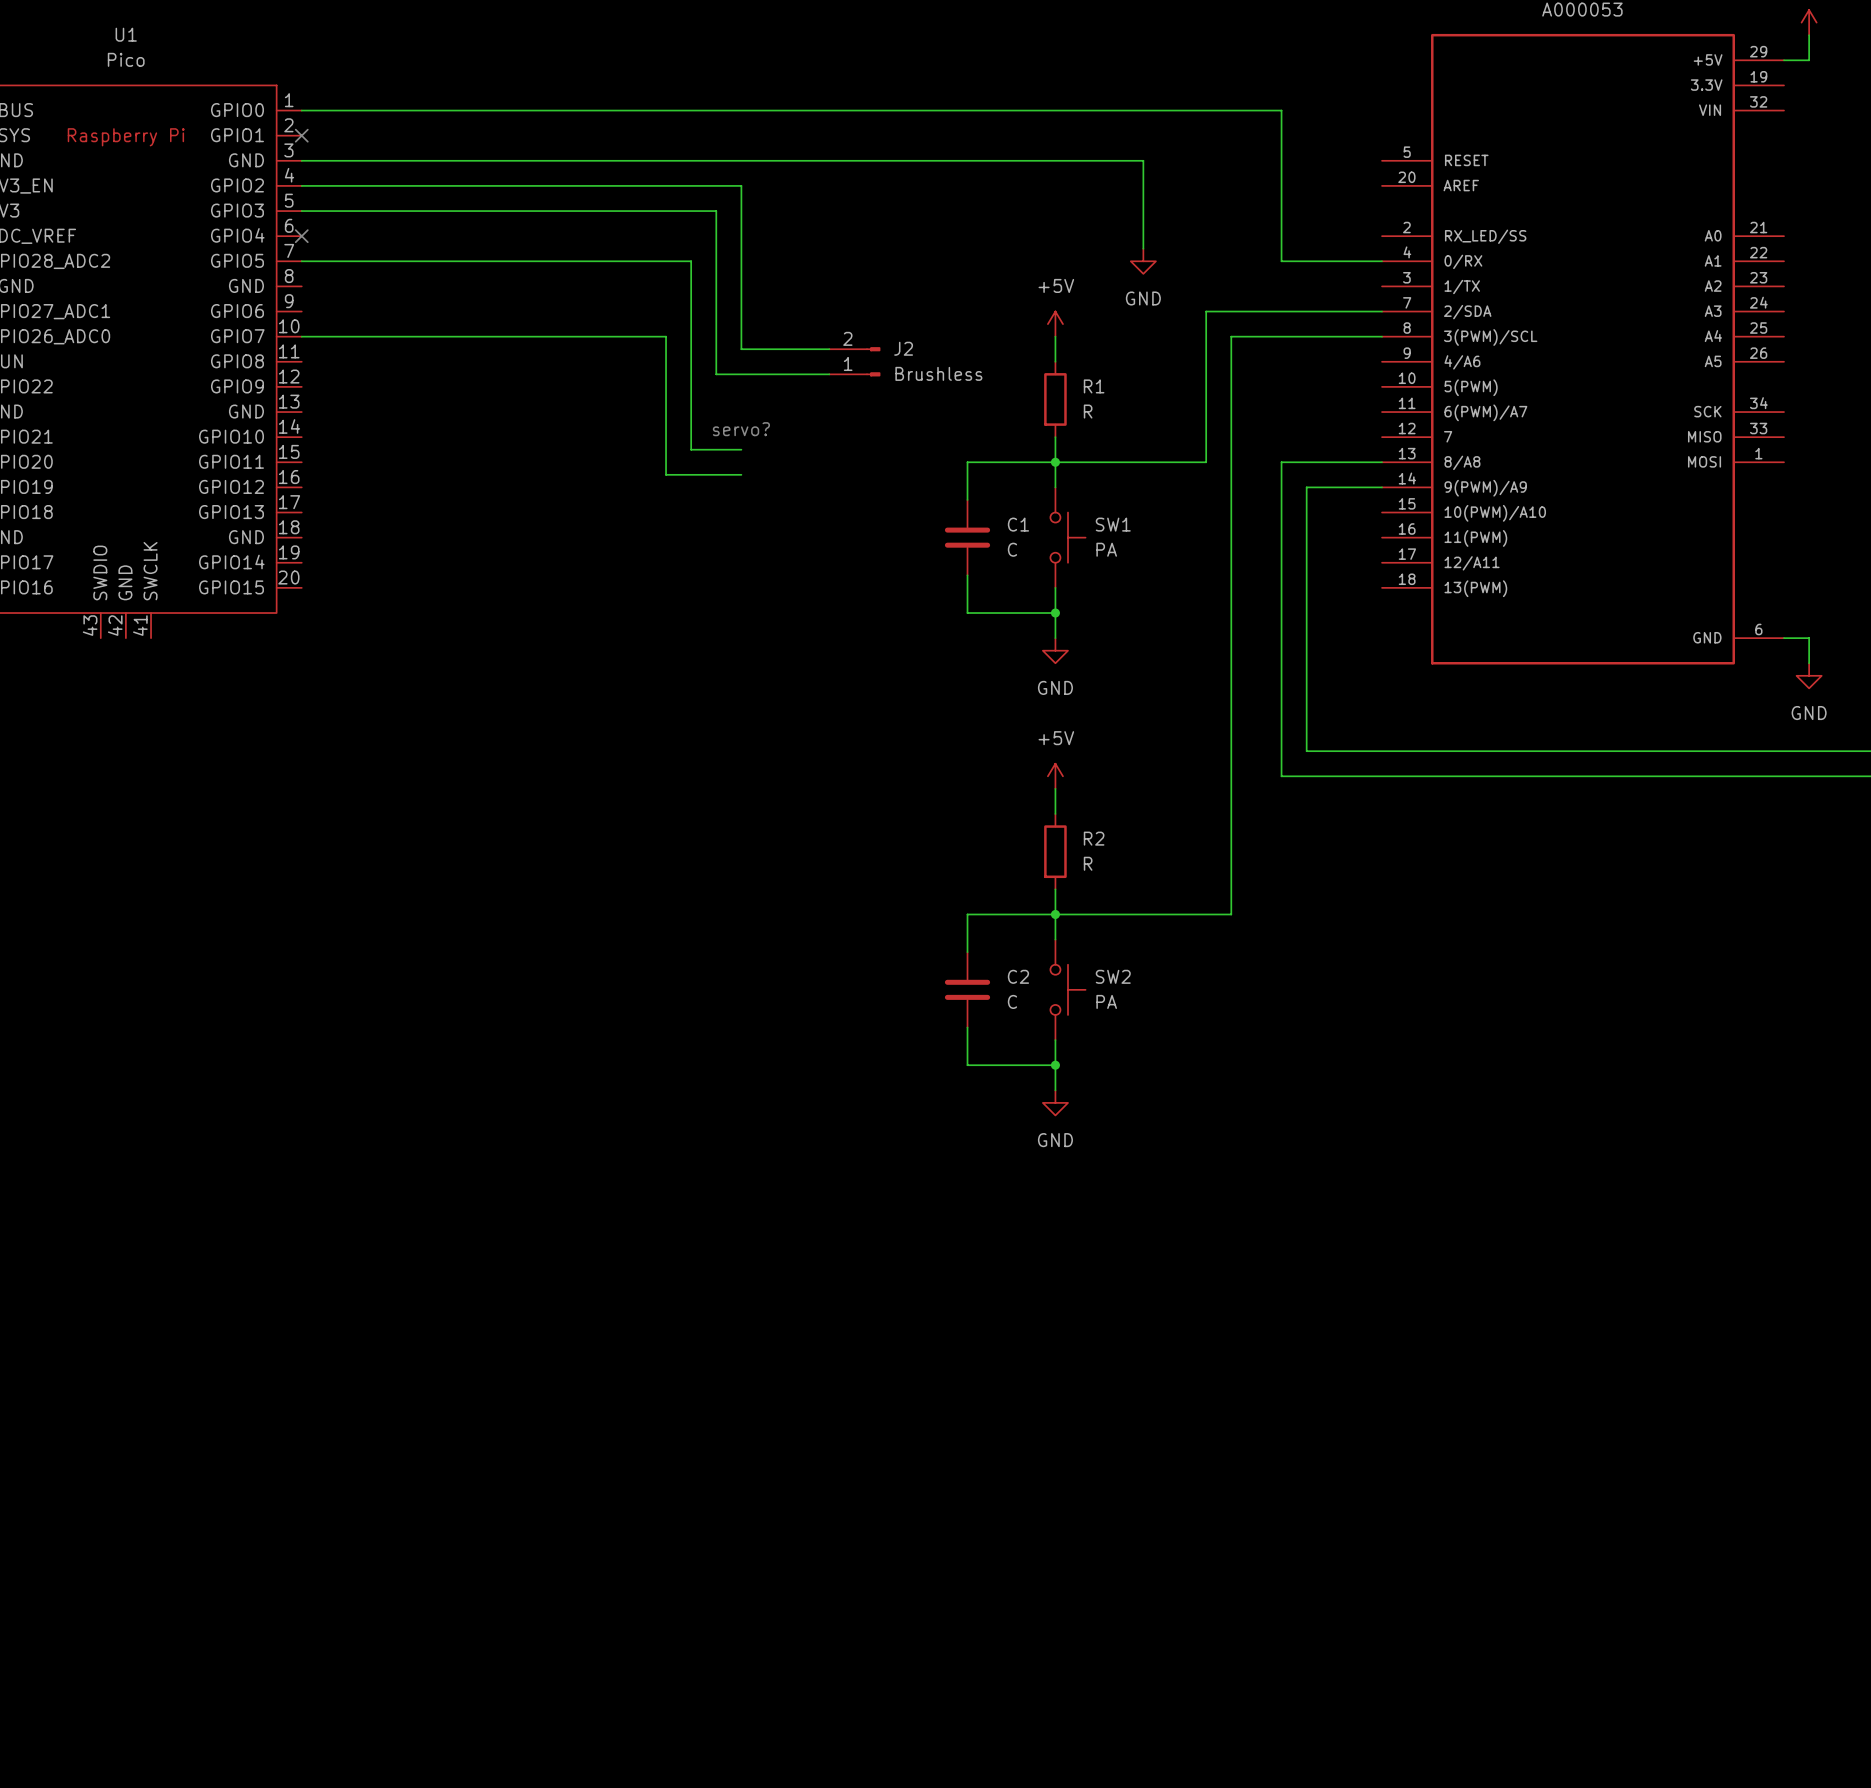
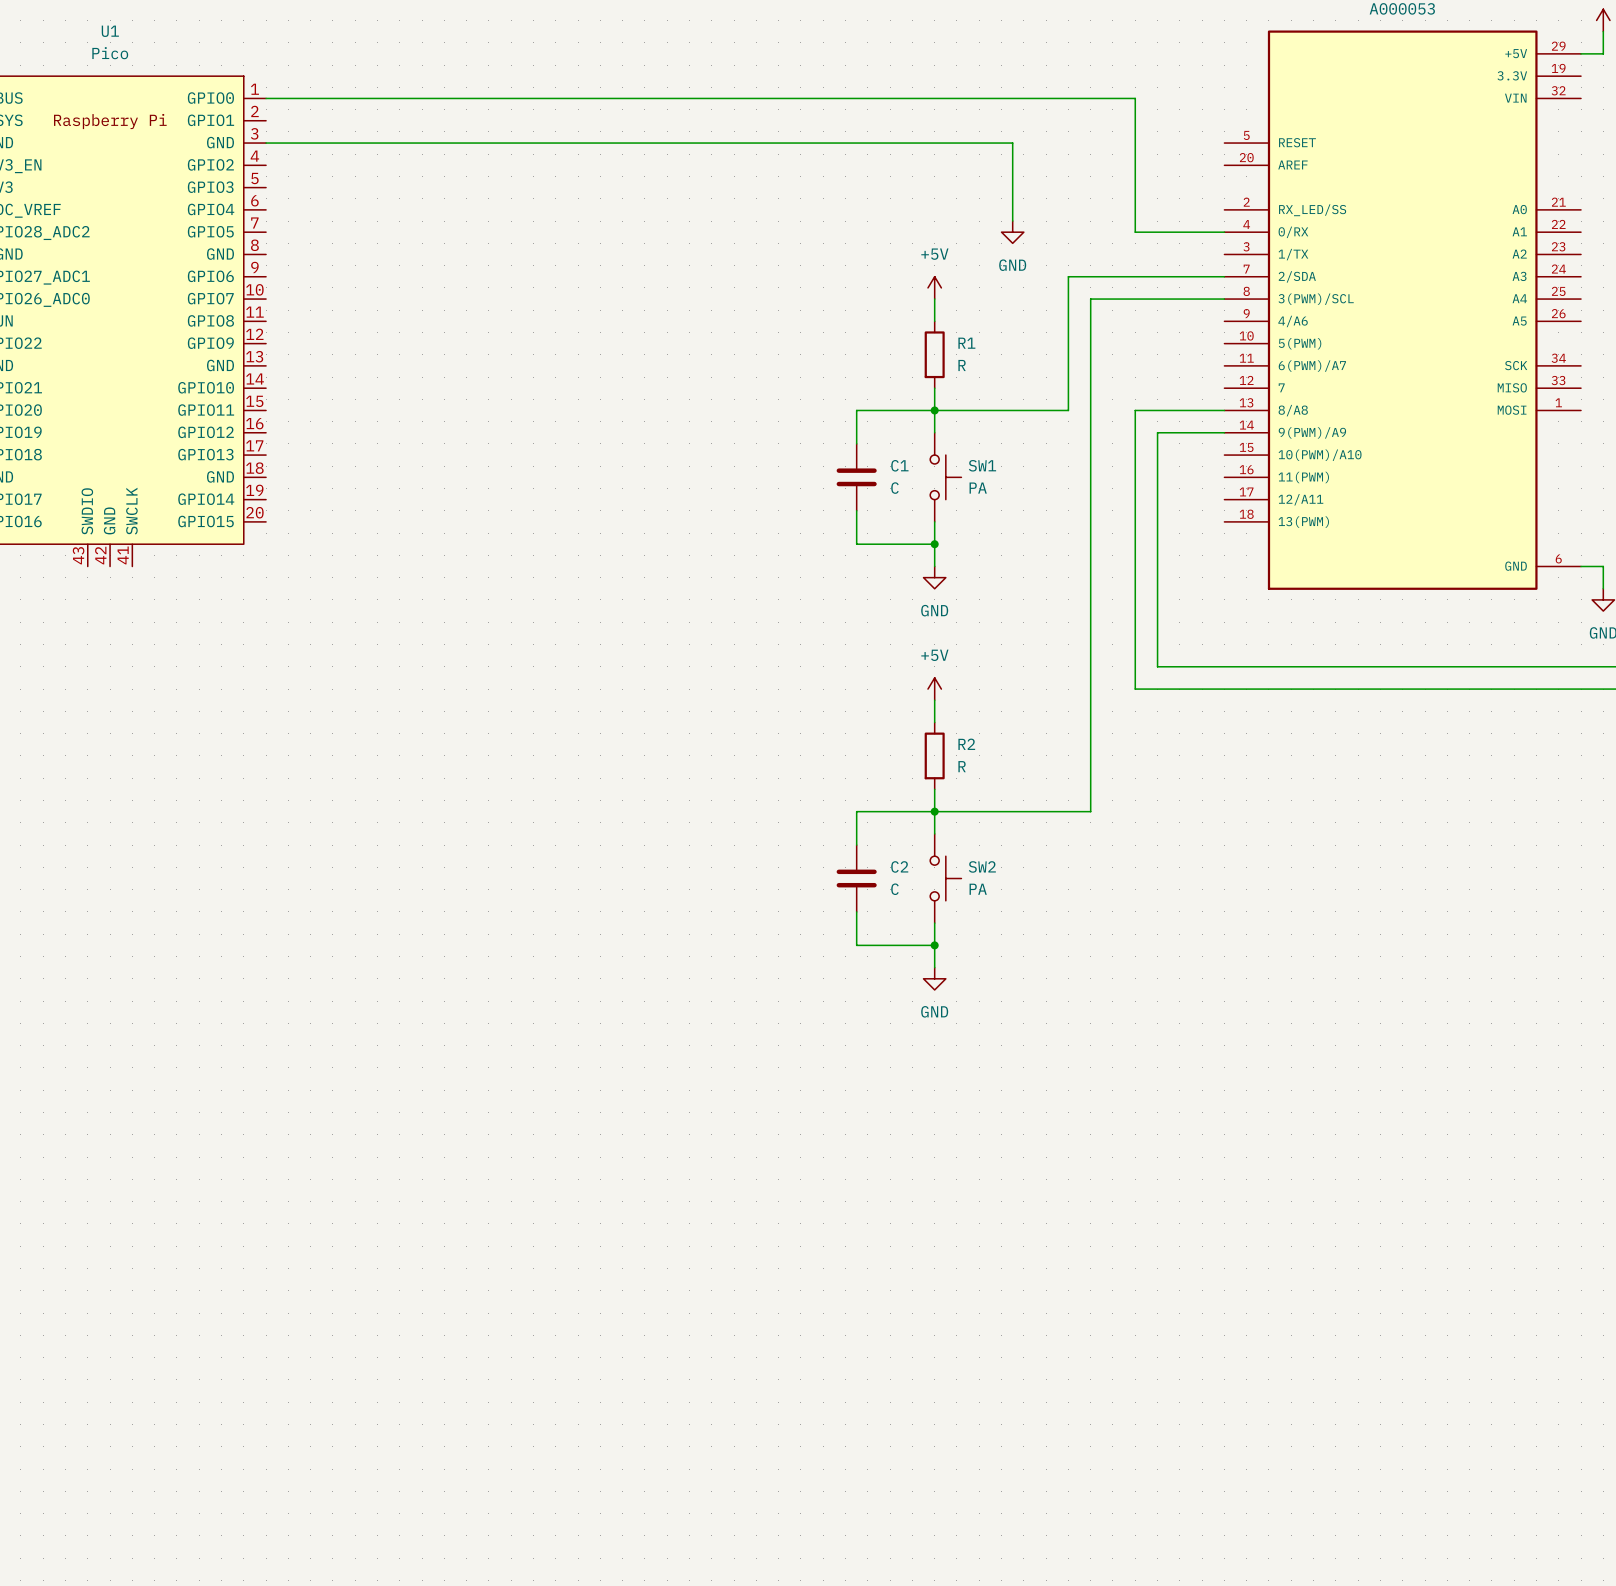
no-connect mark: (301, 135) -> none
wire: (301, 185) (741, 185) (741, 349) (829, 349) -> none
wire: (301, 211) (716, 211) (716, 374) (829, 374) -> none
no-connect mark: (301, 236) -> none
wire: (301, 261) (691, 261) (691, 449) (741, 449) -> none
wire: (301, 336) (666, 336) (666, 474) (741, 474) -> none
J2: Brushless (854, 361) -> none
text: servo? (741, 429) -> none

